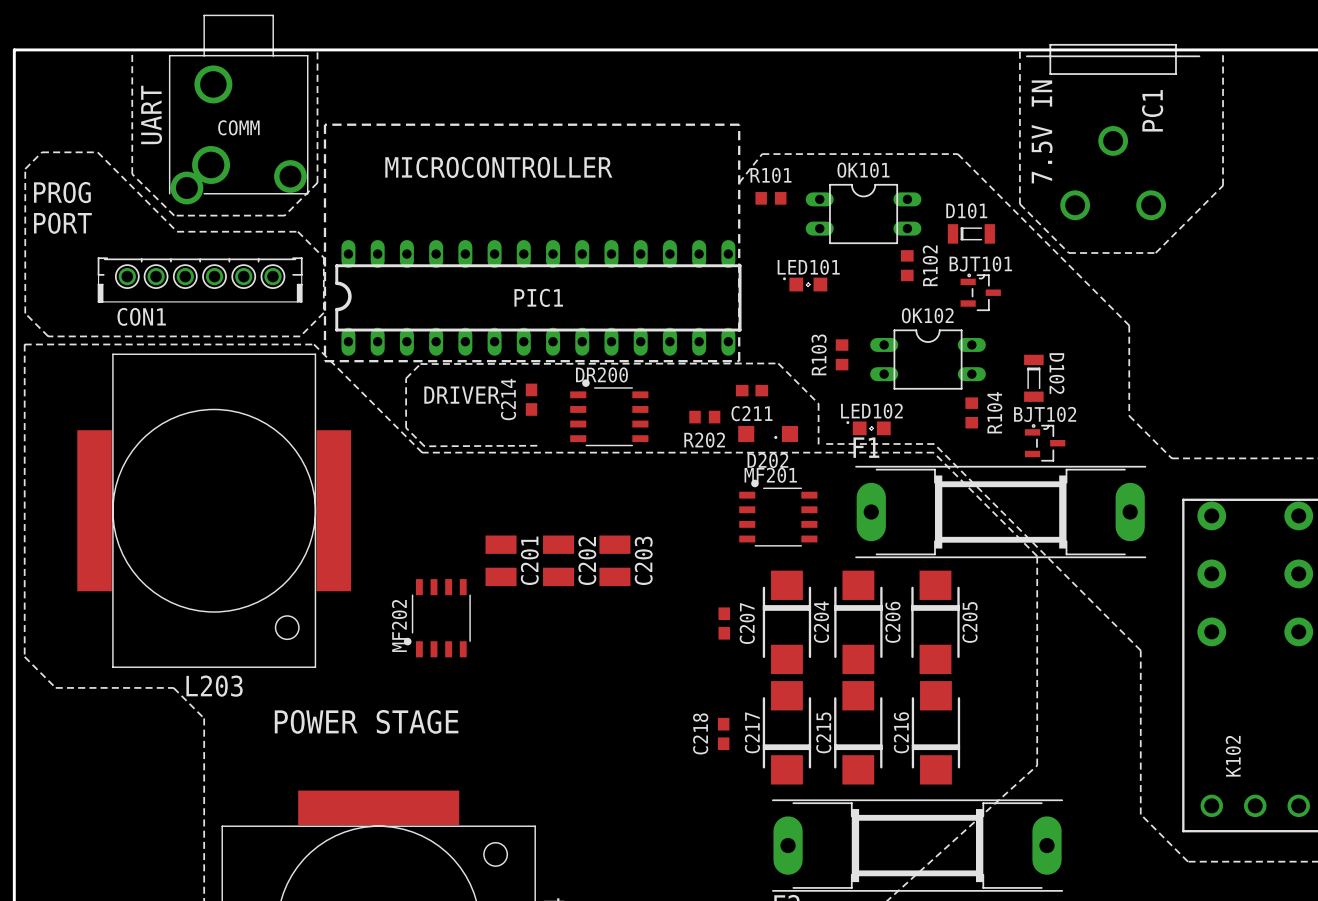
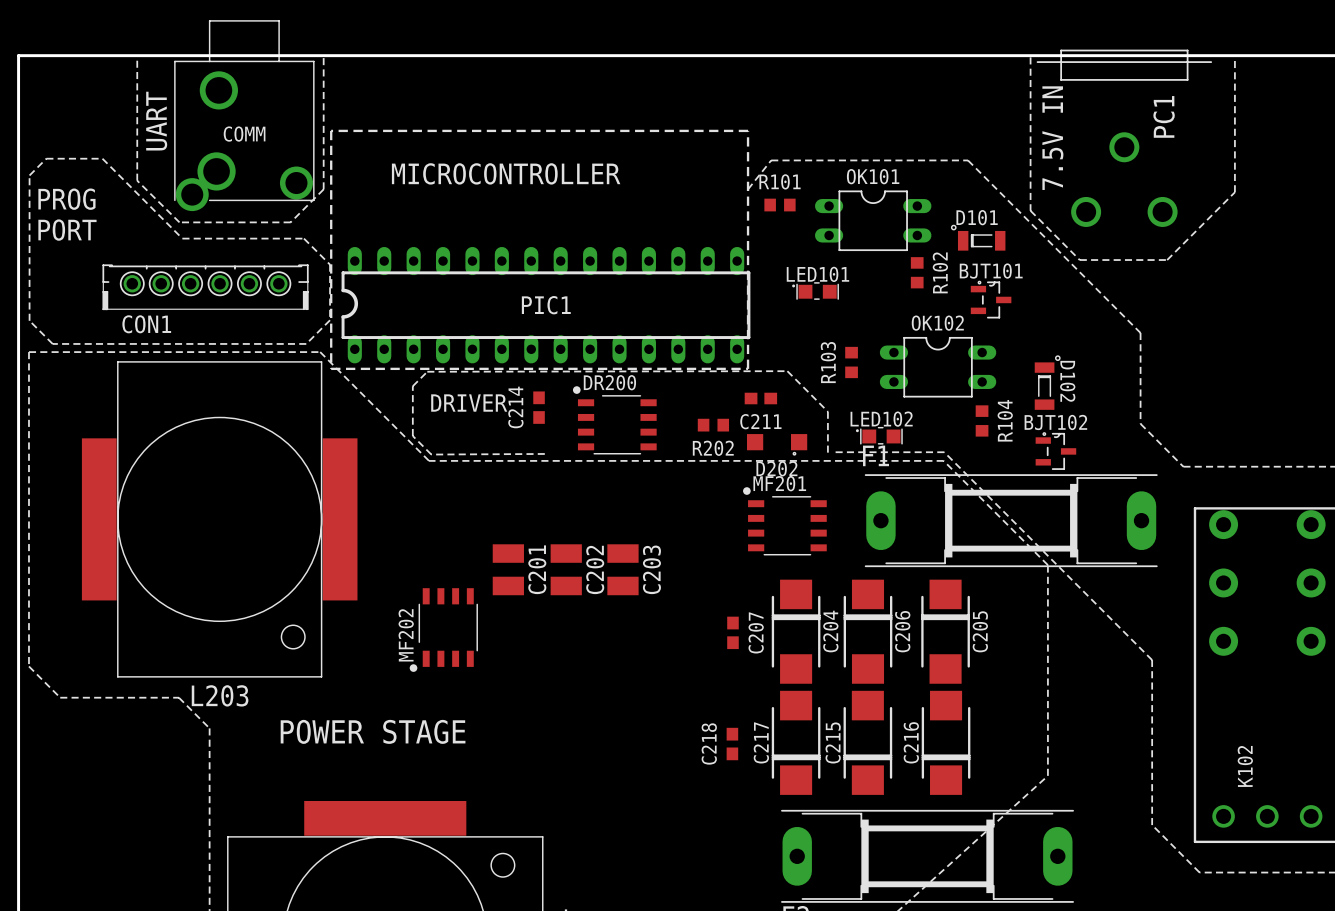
D101 footprint: [947, 224, 995, 244] -> [950, 224, 1006, 251]
LED101 footprint: [783, 277, 828, 292] -> [792, 282, 839, 300]
D102 footprint: [1024, 354, 1044, 402] -> [1034, 355, 1061, 410]
DR200 footprint: [570, 379, 649, 447] -> [572, 386, 657, 455]
LED102 footprint: [846, 421, 891, 436] -> [855, 426, 903, 445]
D202 footprint: [738, 425, 799, 443] -> [747, 434, 808, 456]
MF201 footprint: [739, 479, 818, 547] -> [743, 487, 827, 556]
MF202 footprint: [403, 579, 471, 658] -> [409, 588, 478, 672]

